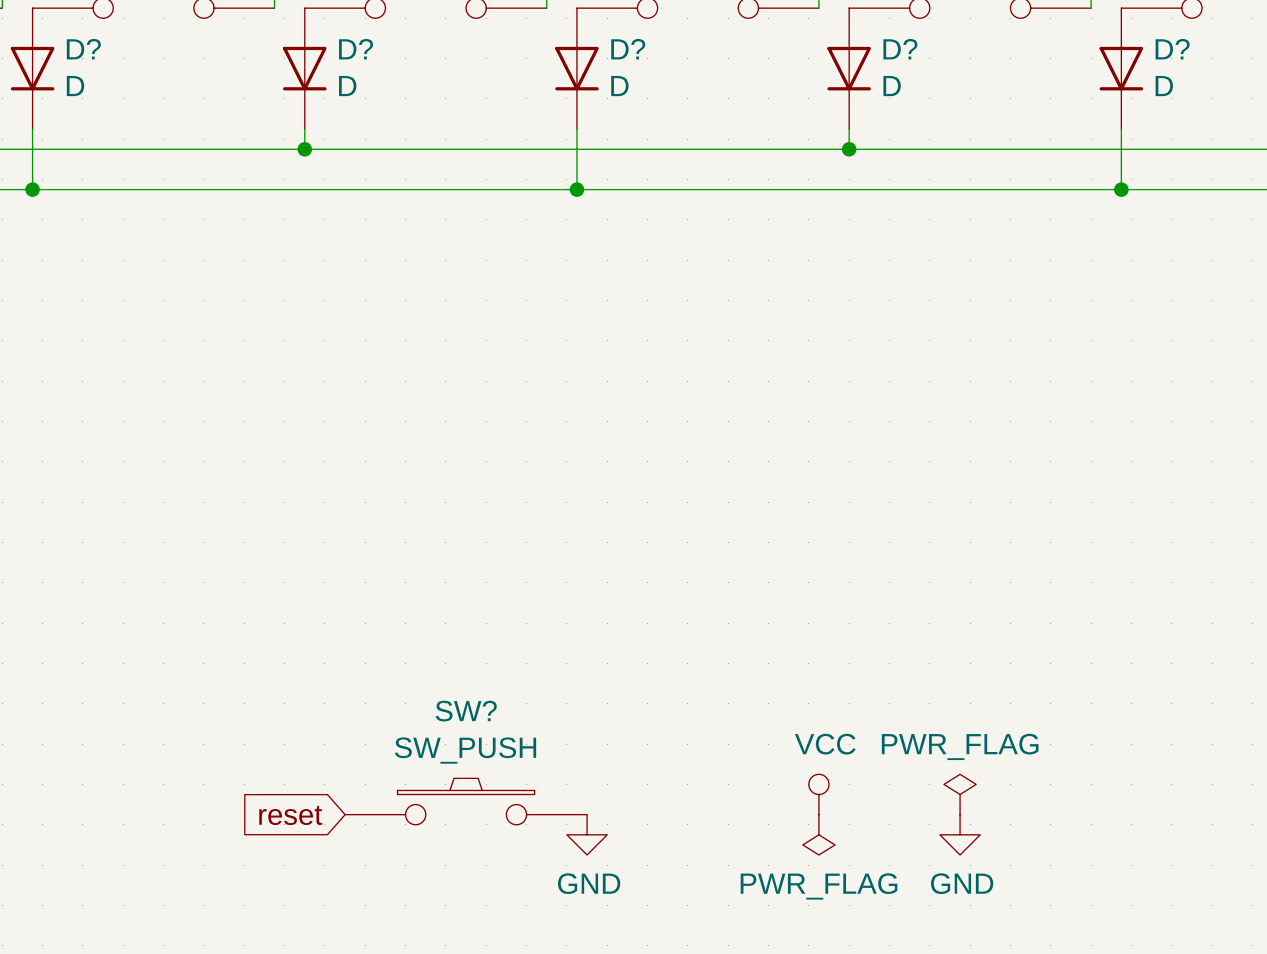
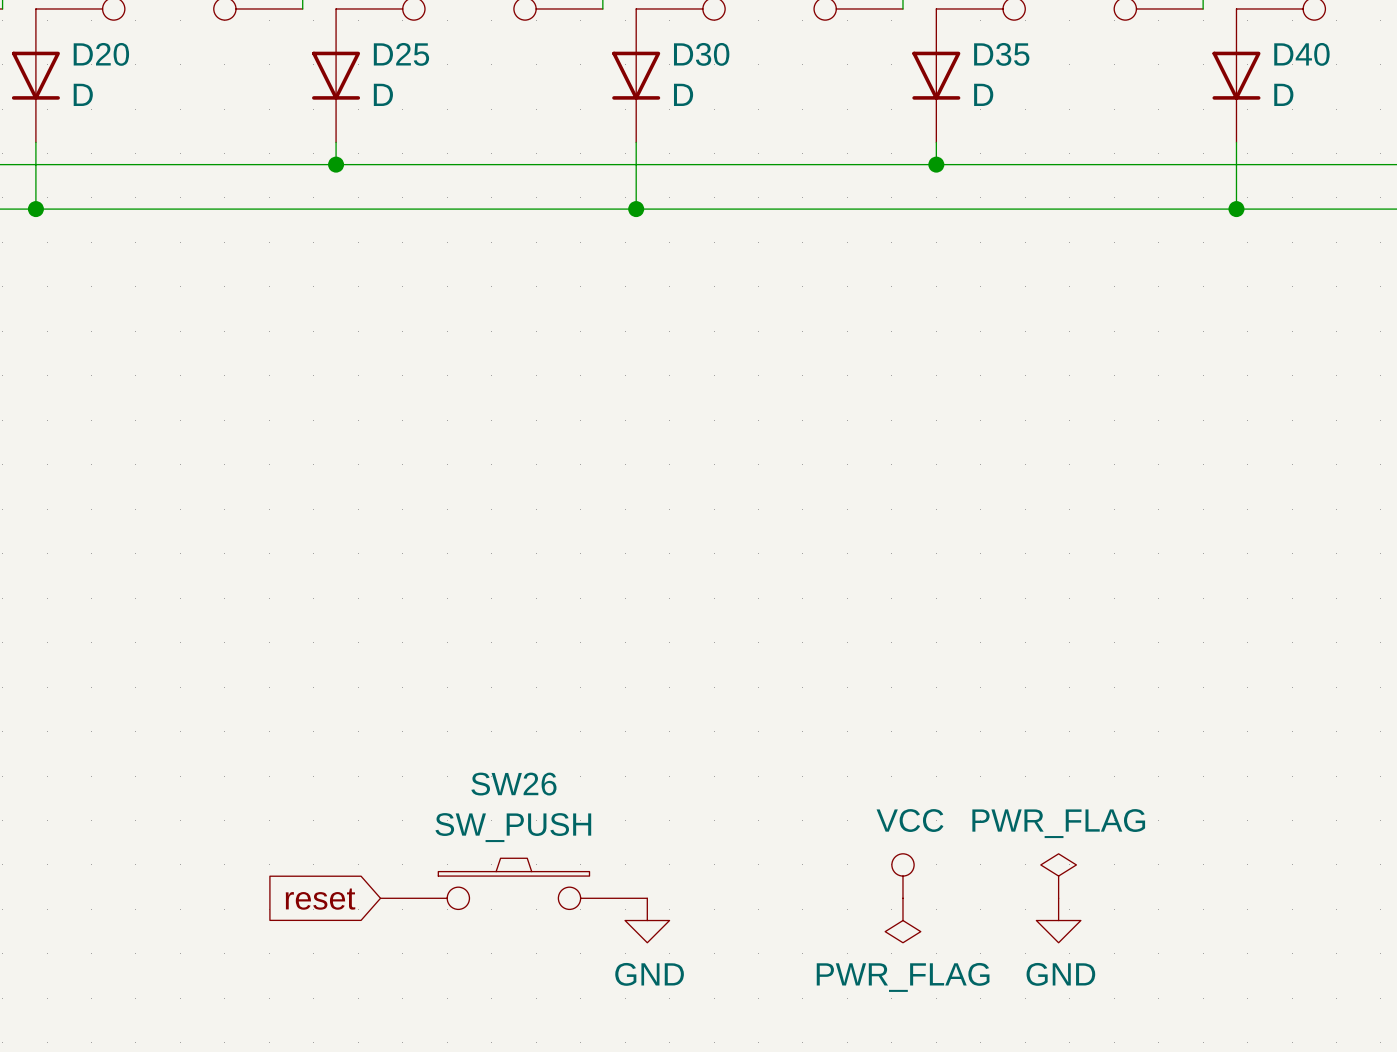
D? name: D? (83, 49) -> D20 (101, 54)
D? name: D? (356, 49) -> D25 (401, 54)
D? name: D? (628, 49) -> D30 (701, 54)
D? name: D? (900, 49) -> D35 (1001, 54)
D? name: D? (1172, 49) -> D40 (1301, 54)
SW? name: SW? (466, 711) -> SW26 (513, 784)

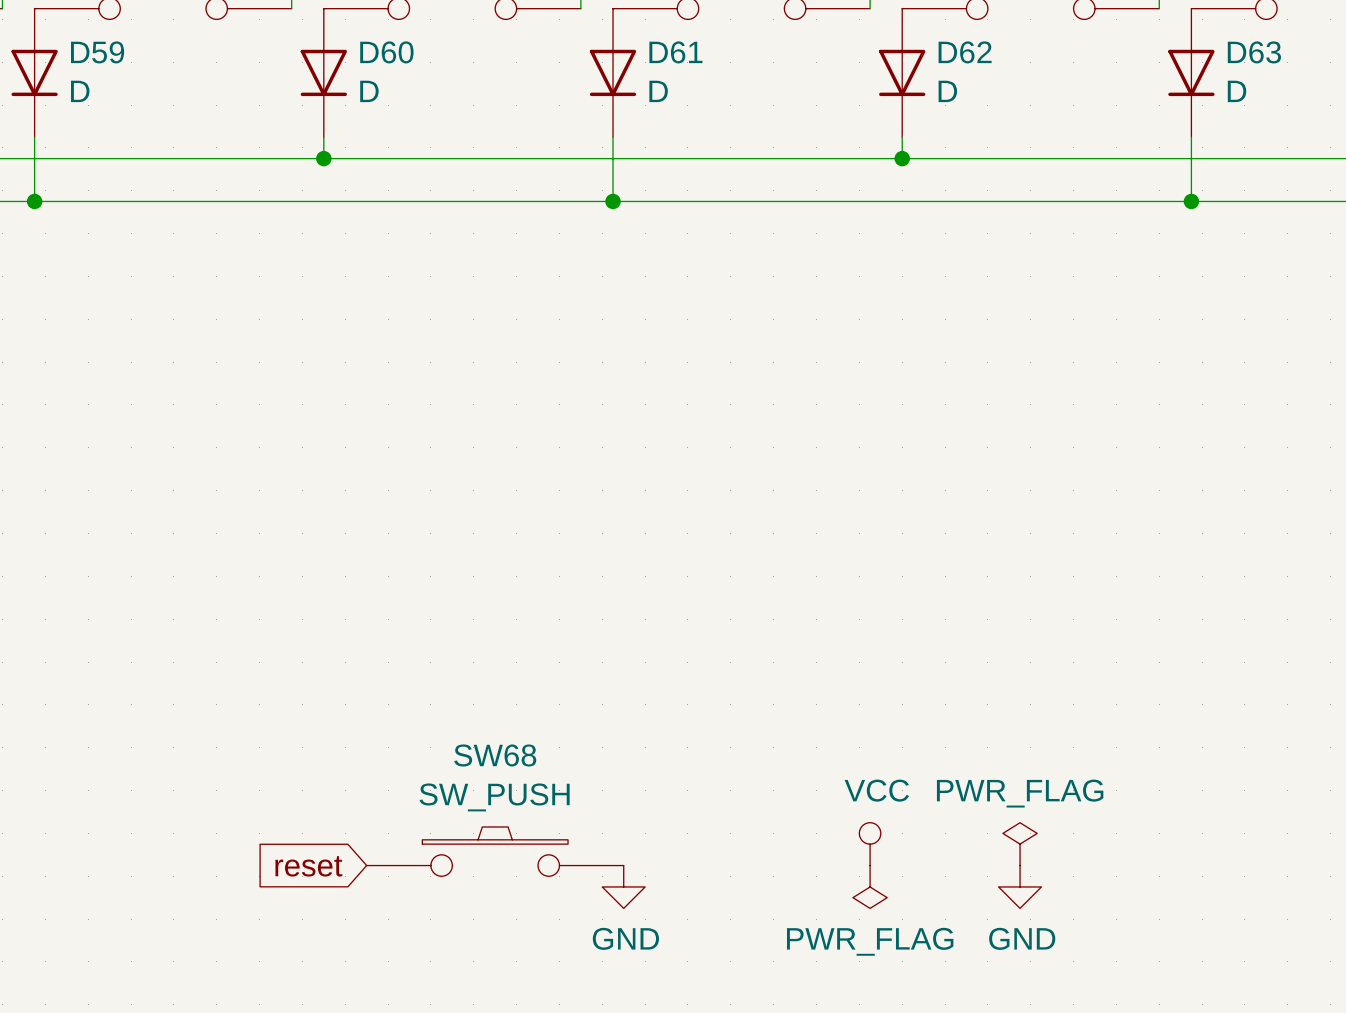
D20 name: D20 (101, 54) -> D59 (97, 52)
D25 name: D25 (401, 54) -> D60 (386, 52)
D30 name: D30 (701, 54) -> D61 (675, 52)
D35 name: D35 (1001, 54) -> D62 (965, 52)
D40 name: D40 (1301, 54) -> D63 (1254, 52)
SW26 name: SW26 (513, 784) -> SW68 (495, 755)

